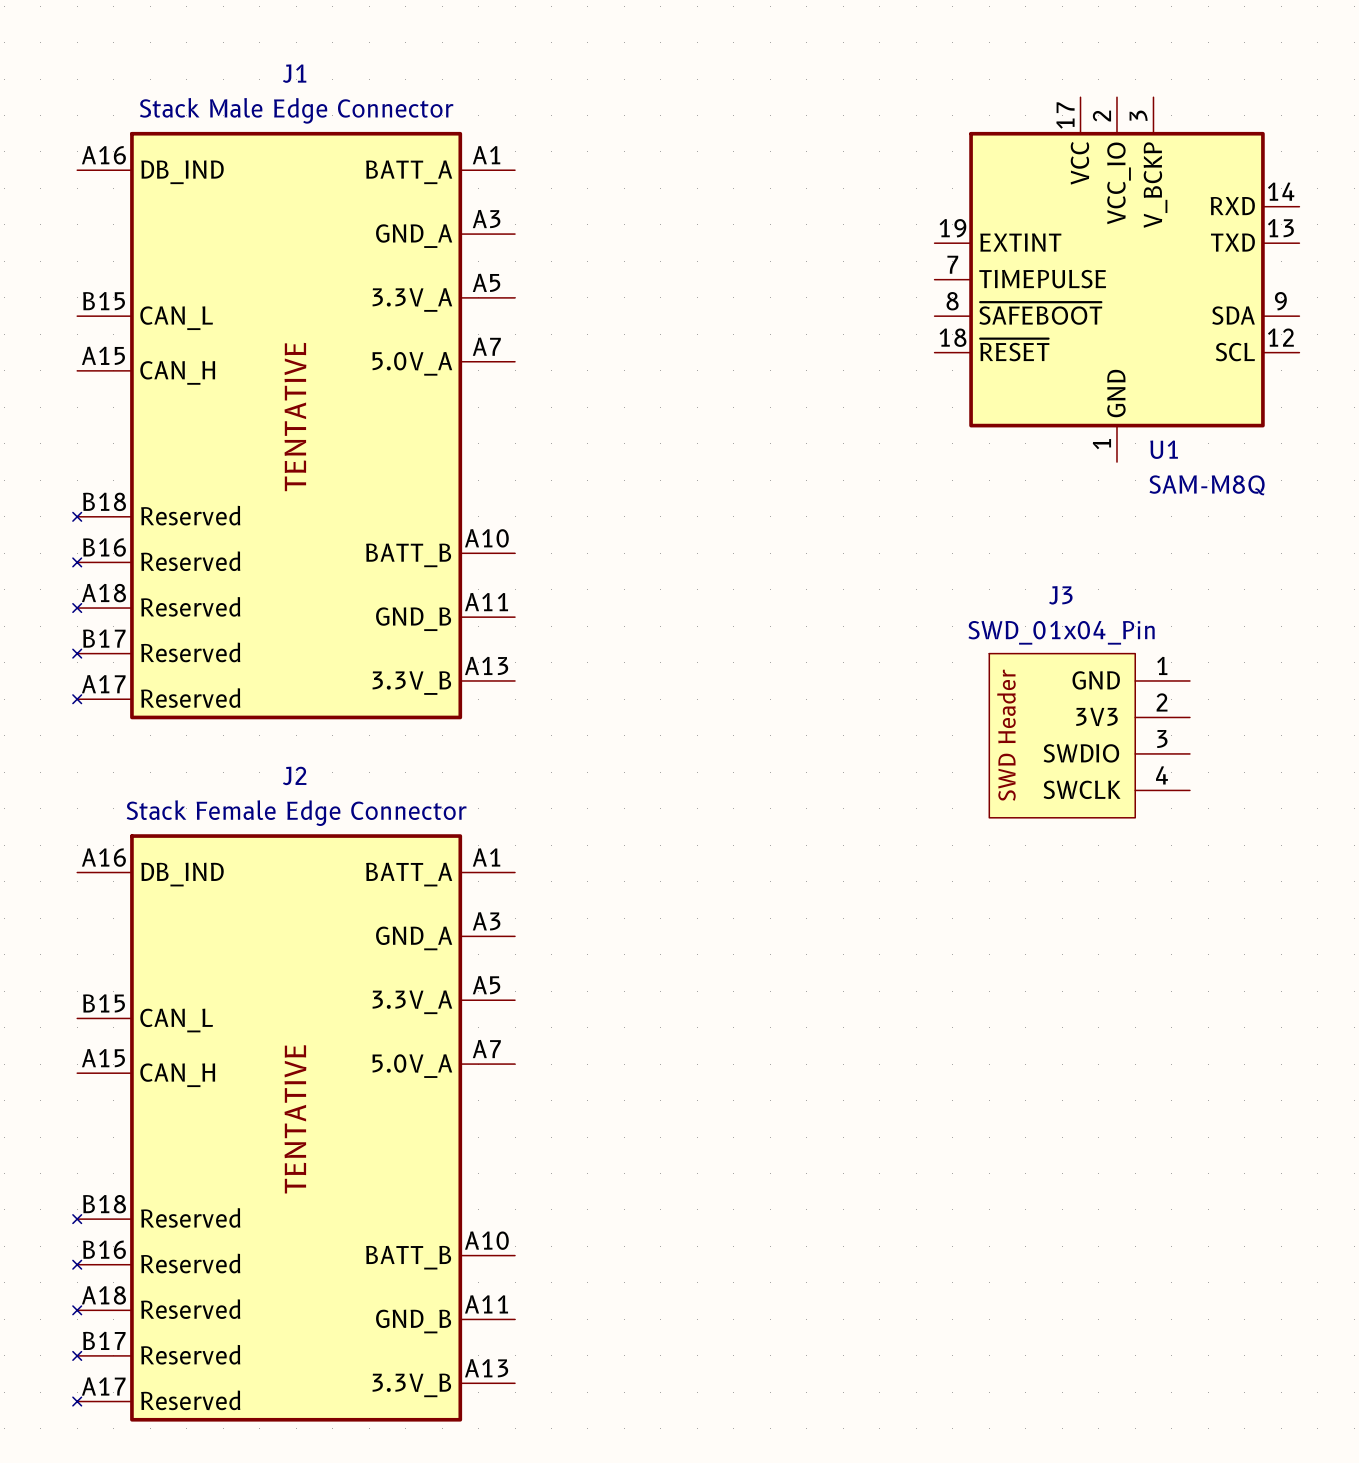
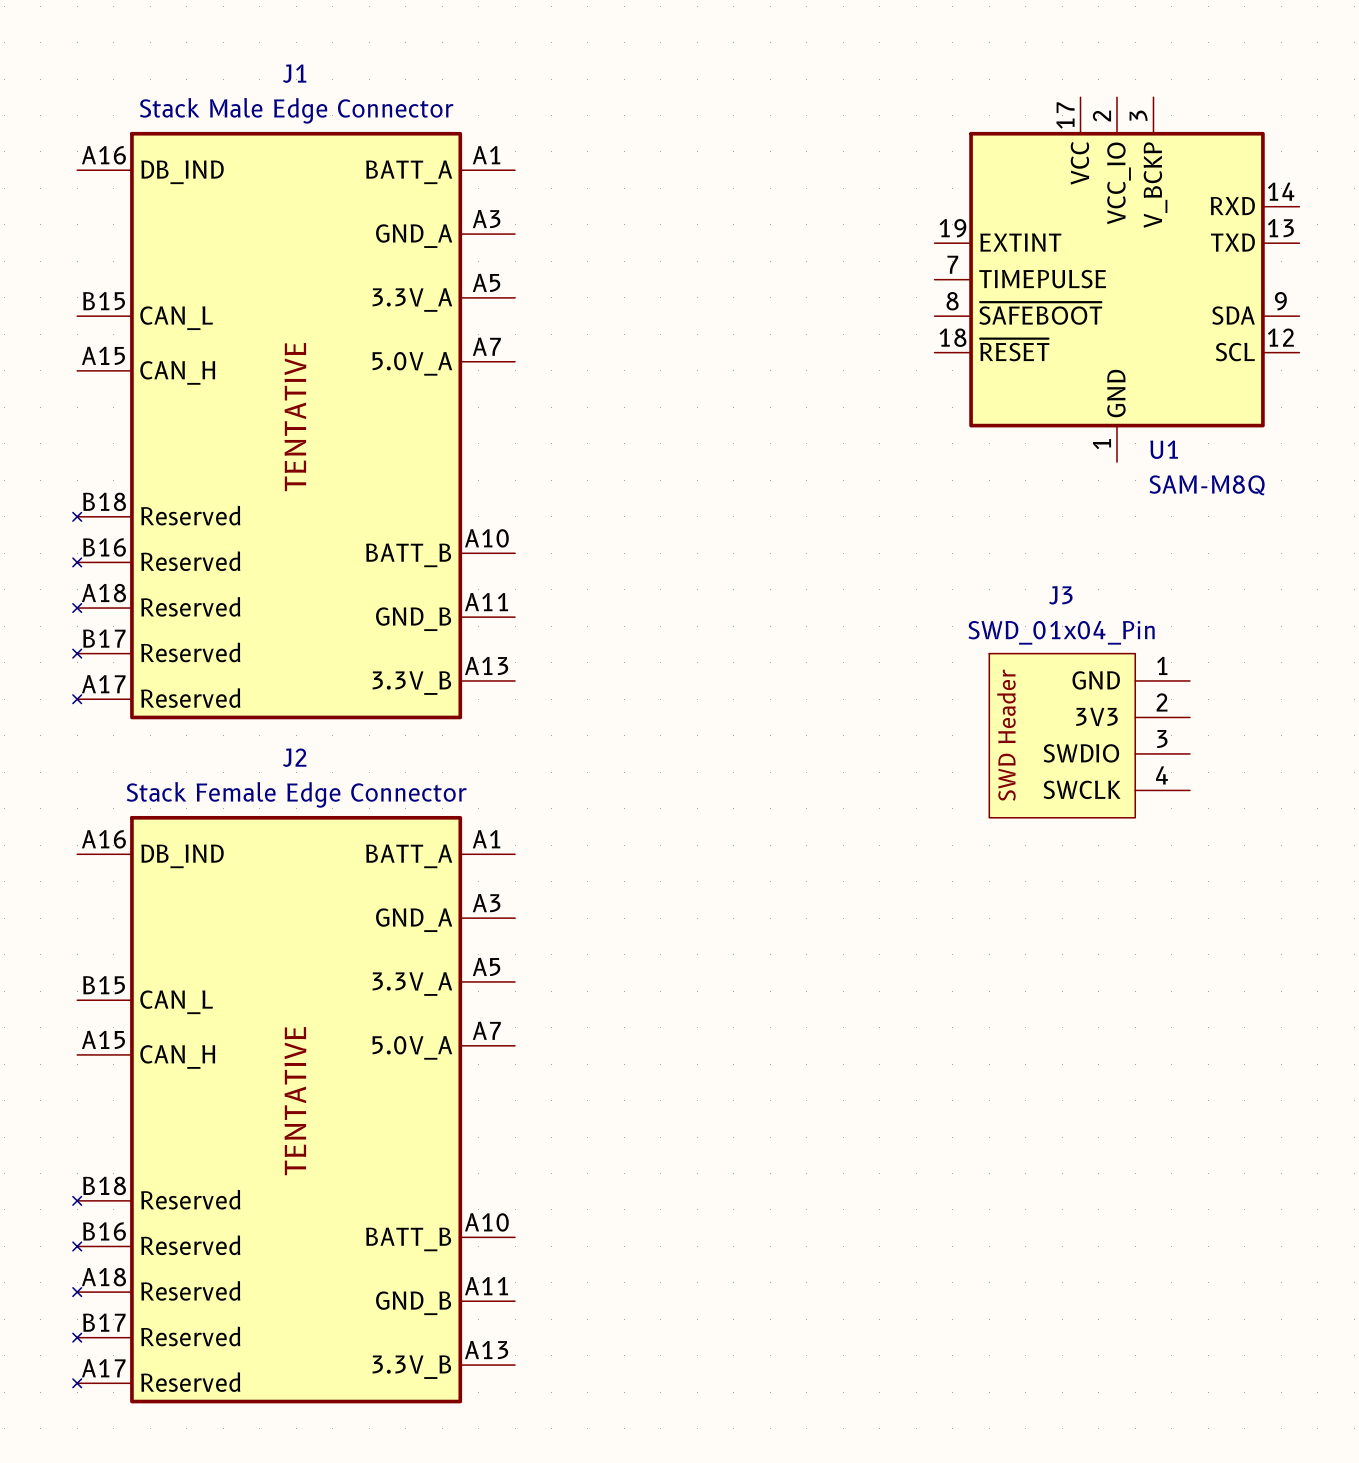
J2 position: (293, 1127) -> (293, 1109)

